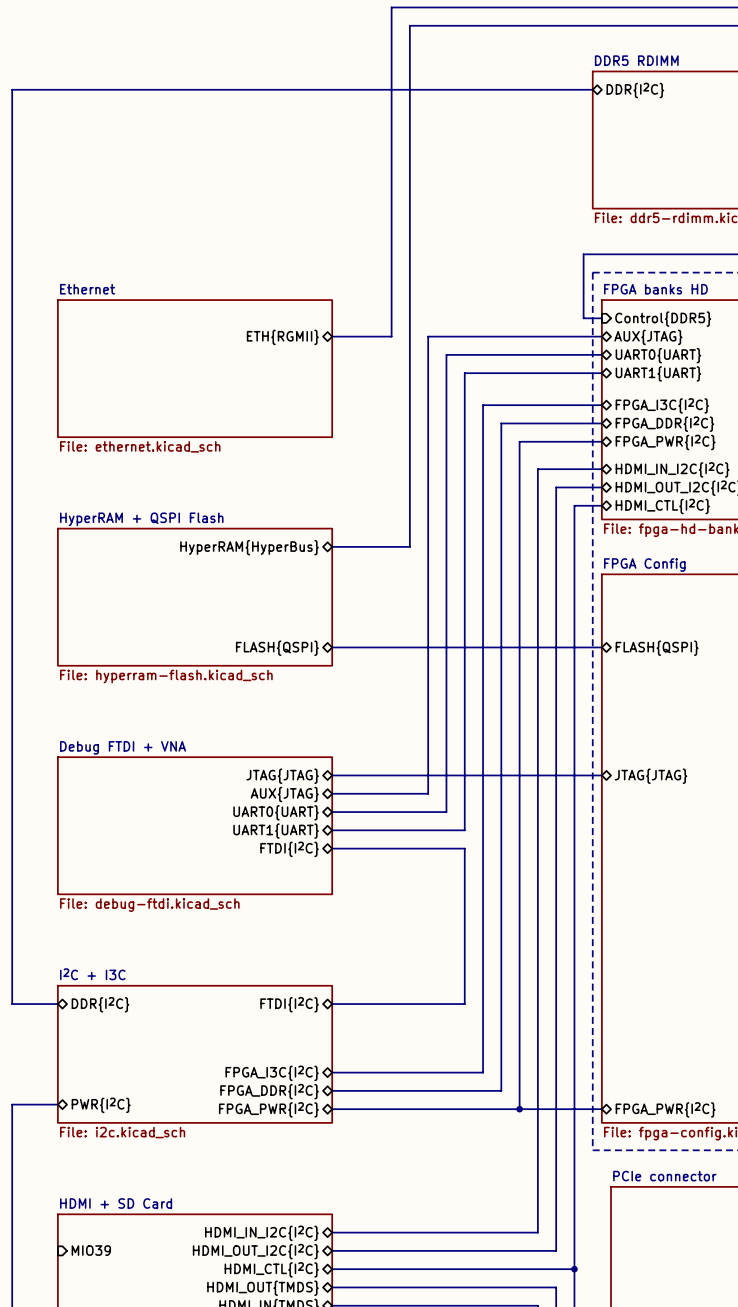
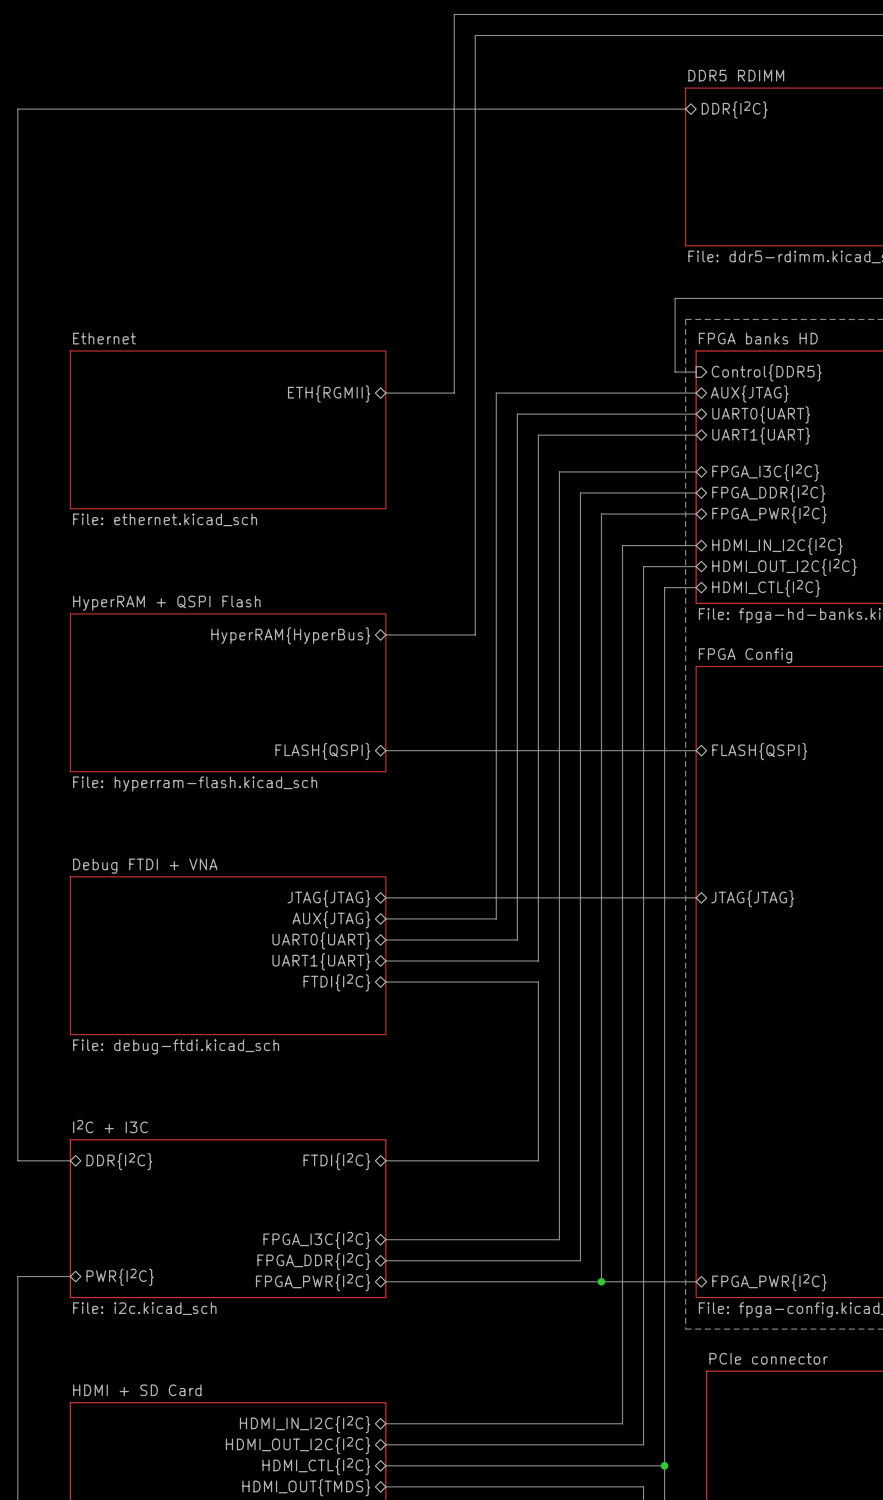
sheet pin: MIO39 (91, 1250) -> none

